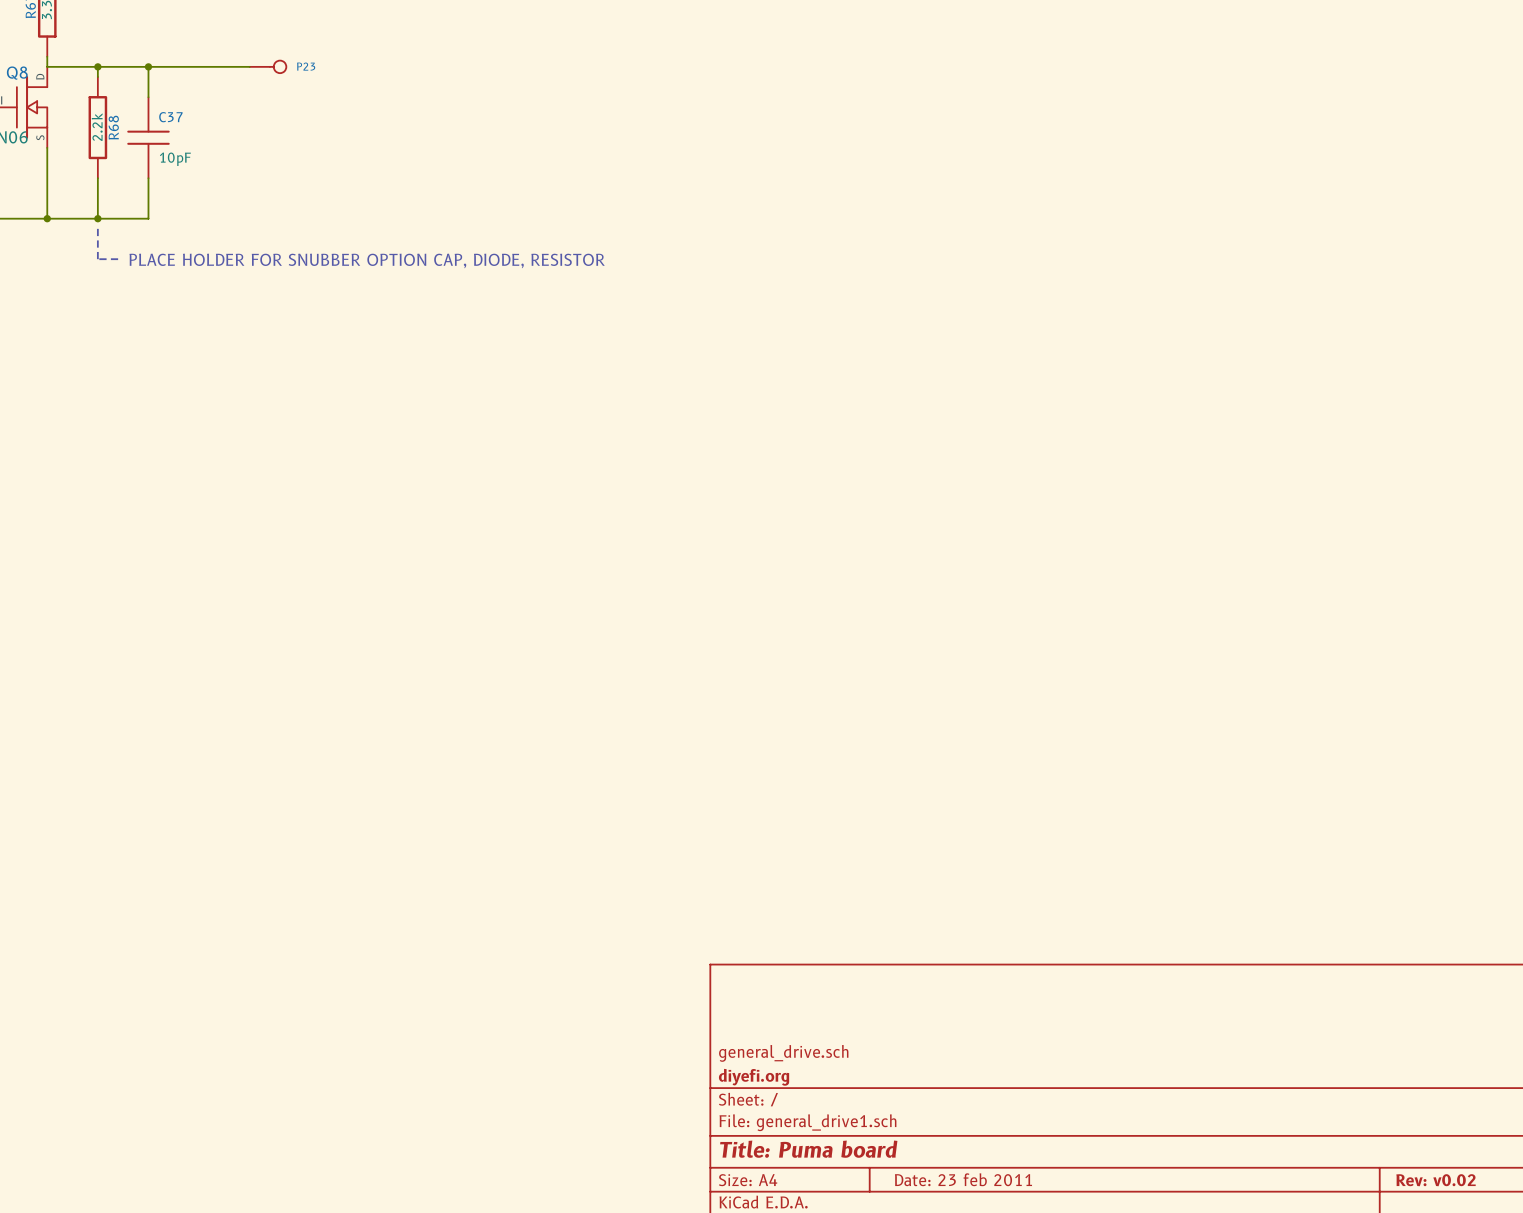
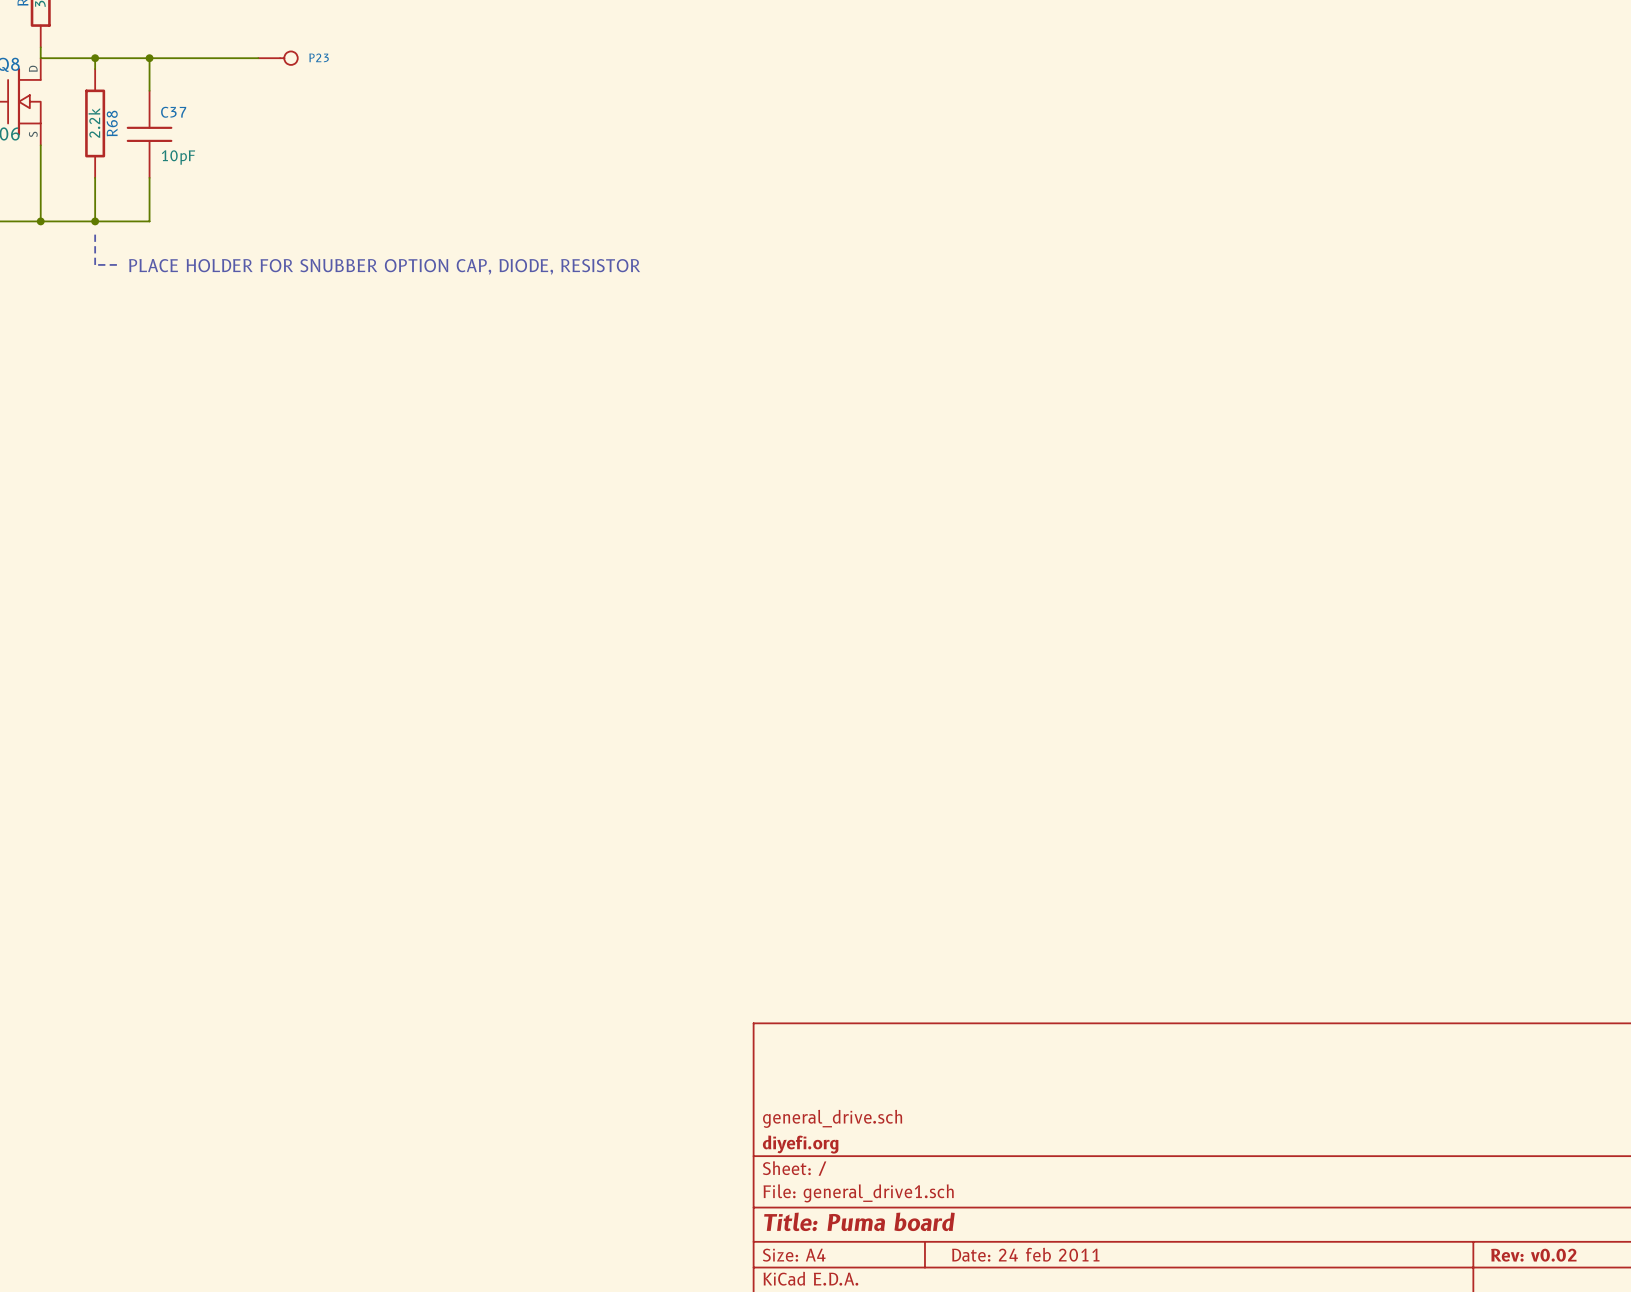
title block: Date: 23 feb 2011 (963, 1179) -> Date: 24 feb 2011 (1025, 1254)

